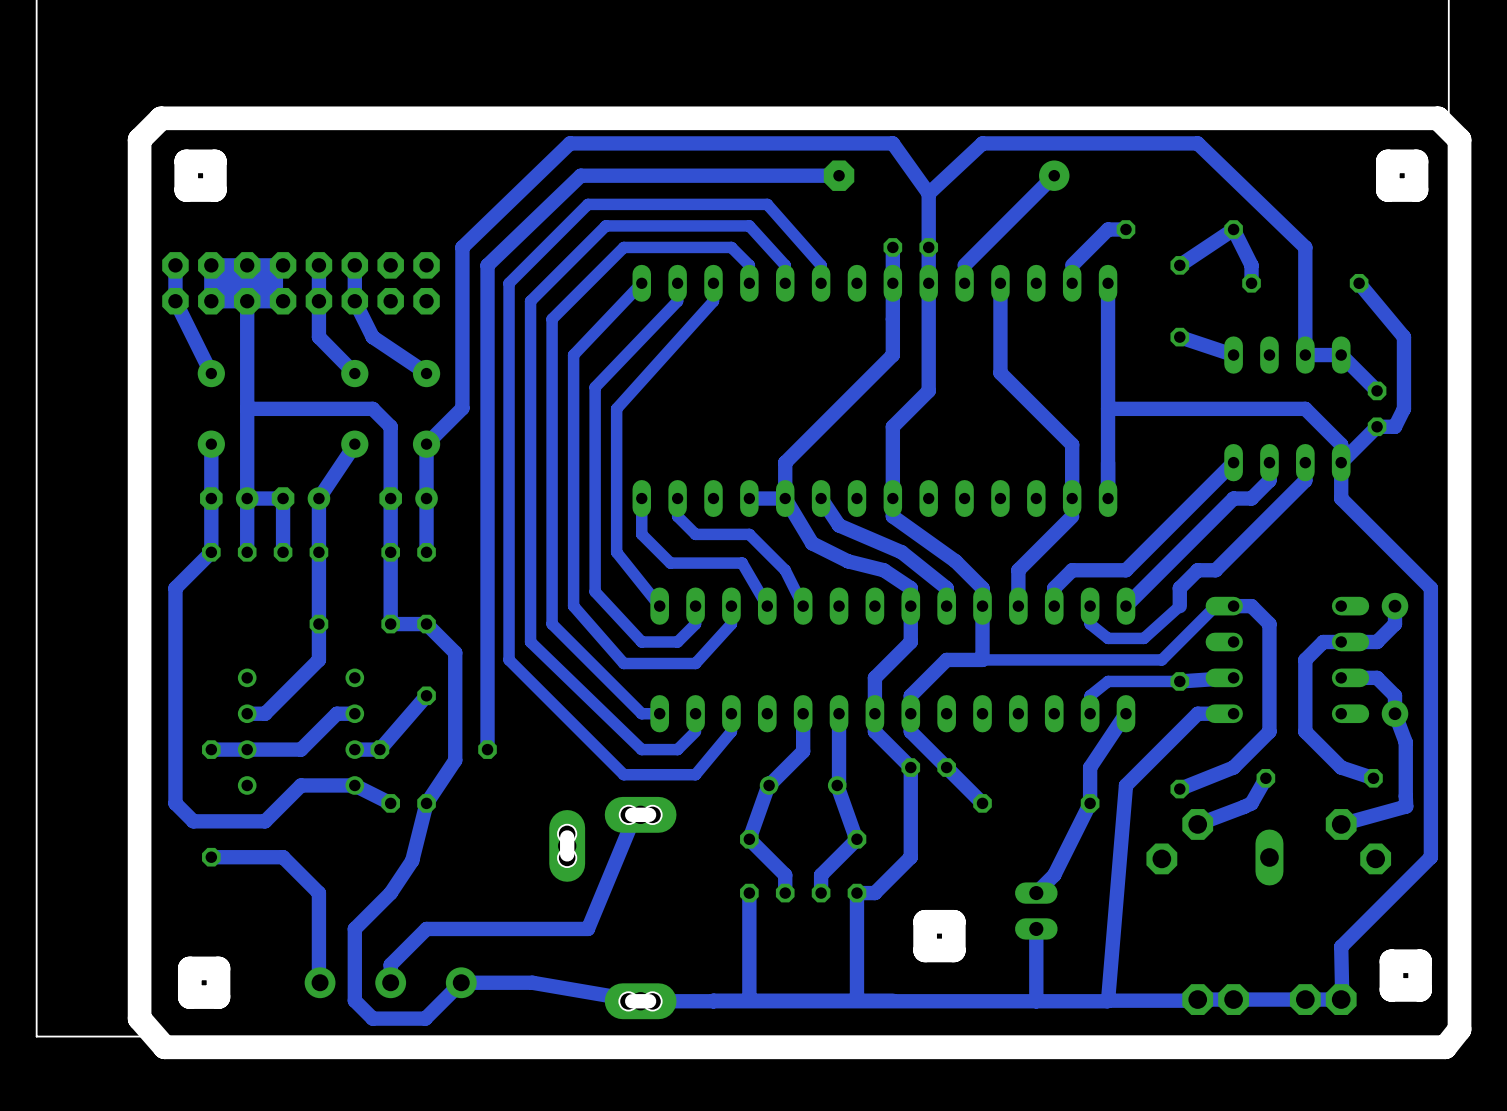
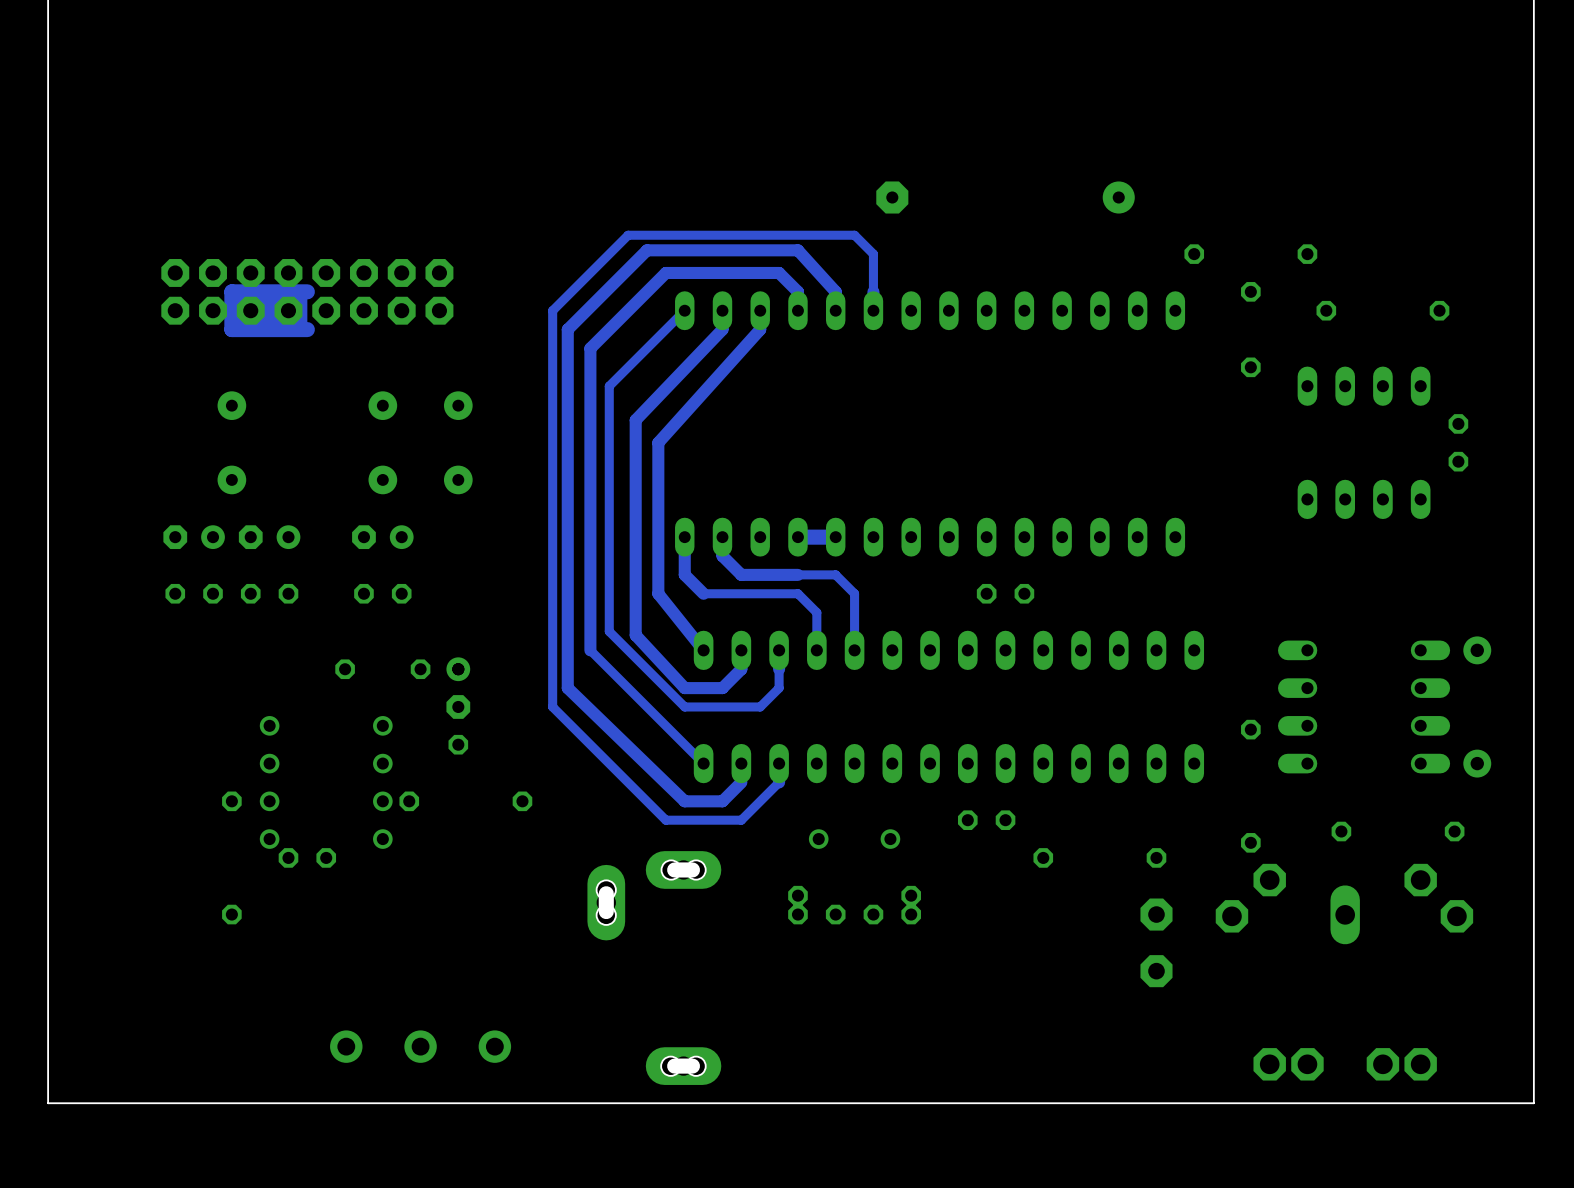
board edge: (1438, 118) (161, 118) (139, 139) (139, 1018) (164, 1047) (1445, 1047) (1459, 1029) (1459, 139) (1438, 118) -> none
board edge: (214, 161) (186, 161) (186, 190) (214, 190) (214, 161) -> none
board edge: (1416, 161) (1387, 161) (1387, 190) (1416, 190) (1416, 161) -> none
bottom track: (839, 175) (580, 175) (487, 265) (487, 749) -> none
bottom track: (1054, 175) (964, 265) (964, 283) -> none
bottom track: (928, 193) (928, 390) (892, 426) (892, 516) (955, 561) (982, 588) (982, 659) -> none
bottom track: (928, 193) (892, 143) (570, 143) (462, 247) (462, 408) (426, 444) (426, 552) -> none
bottom track: (928, 193) (982, 143) (1197, 143) (1305, 247) (1305, 355) (1341, 355) (1377, 390) -> none
bottom track: (1125, 229) (1108, 229) (1072, 265) (1072, 283) -> none
part: (910, 247) -> none
bottom track: (175, 265) (175, 301) (211, 373) -> none
bottom track: (318, 265) (318, 337) (354, 373) -> none
bottom track: (354, 265) (354, 301) (372, 337) (426, 373) -> none
bottom track: (821, 265) (767, 204) (587, 204) (509, 283) (509, 659) (623, 774) (695, 774) (731, 731) -> (873, 291) (873, 254) (854, 235) (628, 235) (552, 310) (552, 706) (665, 820) (741, 820) (779, 782)
bottom track: (1179, 265) (1233, 229) (1251, 265) (1251, 283) -> none
part position: (301, 283) -> (307, 291)
bottom track: (641, 283) (573, 355) (573, 606) (623, 663) (695, 663) (731, 624) -> (684, 310) (609, 386) (609, 631) (684, 706) (760, 706) (779, 688) (779, 669)
bottom track: (1000, 283) (1000, 372) (1072, 444) (1072, 516) (1018, 570) (1018, 606) -> none
bottom track: (1108, 283) (1108, 498) -> none
bottom track: (1359, 283) (1403, 337) (1403, 408) (1395, 426) (1377, 426) (1341, 462) -> none
bottom track: (247, 301) (247, 552) -> none
bottom track: (892, 319) (892, 247) (892, 355) (785, 462) (785, 498) (812, 543) (848, 561) (883, 570) (910, 588) (910, 641) (874, 677) (874, 731) (910, 767) (910, 857) (874, 893) (856, 893) (856, 1000) -> none
bottom track: (1179, 337) (1233, 355) -> none
bottom track: (247, 408) (372, 408) (390, 426) (390, 624) (426, 624) (455, 652) (455, 760) (426, 803) (412, 860) (390, 893) (354, 928) (354, 1000) (372, 1018) (425, 1018) (461, 982) (532, 982) (640, 1001) (1108, 1000) -> none
bottom track: (1108, 408) (1305, 408) (1341, 444) (1341, 498) (1430, 588) (1430, 857) (1341, 946) (1342, 1000) (1108, 1000) -> none
bottom track: (211, 444) (211, 552) (175, 588) (175, 803) (193, 821) (265, 821) (301, 785) (354, 785) (390, 803) -> none
bottom track: (354, 444) (318, 498) (318, 659) (265, 713) (247, 713) -> none
bottom track: (1233, 462) (1125, 570) (1072, 570) (1054, 588) (1054, 606) -> none
bottom track: (1269, 462) (1269, 480) (1251, 498) (1233, 498) (1125, 606) -> none
bottom track: (1305, 462) (1305, 480) (1215, 570) (1197, 570) (1179, 588) (1179, 606) (1143, 638) (1108, 638) (1090, 624) (1090, 606) -> none
part: none -> (194, 537)
part position: (229, 498) -> (269, 537)
bottom track: (247, 498) (283, 498) (283, 552) -> none
part: (301, 498) -> none
part: none -> (382, 537)
part: (408, 498) -> none
bottom track: (821, 498) (839, 525) (901, 552) (946, 588) (946, 606) -> none
bottom track: (749, 534) (785, 570) (803, 606) -> (797, 574) (835, 574) (854, 593) (854, 650)
part: none -> (194, 593)
part position: (229, 552) -> (269, 593)
part: (301, 552) -> none
part: none -> (382, 593)
part: (408, 552) -> none
bottom track: (659, 552) (670, 563) (742, 563) (767, 606) -> (703, 593) (797, 593) (816, 612) (816, 650)
part: none -> (1005, 593)
bottom track: (552, 606) (552, 624) (641, 713) (659, 713) -> (590, 650) (703, 763)
bottom track: (1395, 606) (1395, 624) (1377, 641) (1323, 641) (1305, 659) (1305, 731) (1341, 767) (1373, 778) -> none
part: none -> (458, 688)
bottom track: (982, 659) (946, 659) (910, 695) (910, 731) (982, 803) -> none
bottom track: (982, 659) (1161, 659) (1215, 606) (1251, 606) (1269, 624) (1269, 731) (1233, 767) (1179, 789) -> none
bottom track: (1233, 677) (1179, 681) (1108, 681) (1090, 695) (1090, 713) -> none
bottom track: (1341, 677) (1377, 677) (1395, 695) (1395, 713) (1405, 742) (1406, 806) (1341, 824) -> none
bottom track: (426, 695) (379, 749) (354, 749) -> none
bottom track: (354, 713) (336, 713) (301, 749) (211, 749) -> none
bottom track: (803, 713) (803, 751) (769, 785) (769, 783) (749, 839) (785, 875) (785, 893) -> none
bottom track: (839, 713) (839, 783) (837, 785) (856, 841) (856, 839) (821, 875) (821, 893) -> none
bottom track: (1125, 713) (1090, 767) (1090, 803) (1054, 875) (1036, 893) -> none
bottom track: (1233, 713) (1197, 713) (1125, 785) (1108, 1000) -> none
bottom track: (1265, 778) (1251, 803) (1197, 824) -> none
part position: (408, 803) -> (307, 857)
bottom track: (640, 814) (635, 814) (587, 928) (426, 928) (390, 964) (390, 982) -> none
bottom track: (211, 857) (283, 857) (318, 893) (320, 982) -> none
part: none -> (1156, 914)
bottom track: (749, 893) (749, 1000) -> none
part position: (767, 893) -> (816, 914)
part position: (839, 893) -> (892, 914)
part: (1036, 911) -> none
part: none -> (1156, 971)
board edge: (953, 921) (925, 921) (925, 950) (953, 950) (953, 921) -> none
bottom track: (1036, 928) (1036, 1001) -> none
board edge: (1420, 961) (1391, 961) (1391, 989) (1420, 989) (1420, 961) -> none
board edge: (218, 968) (189, 968) (189, 997) (218, 997) (218, 968) -> none

